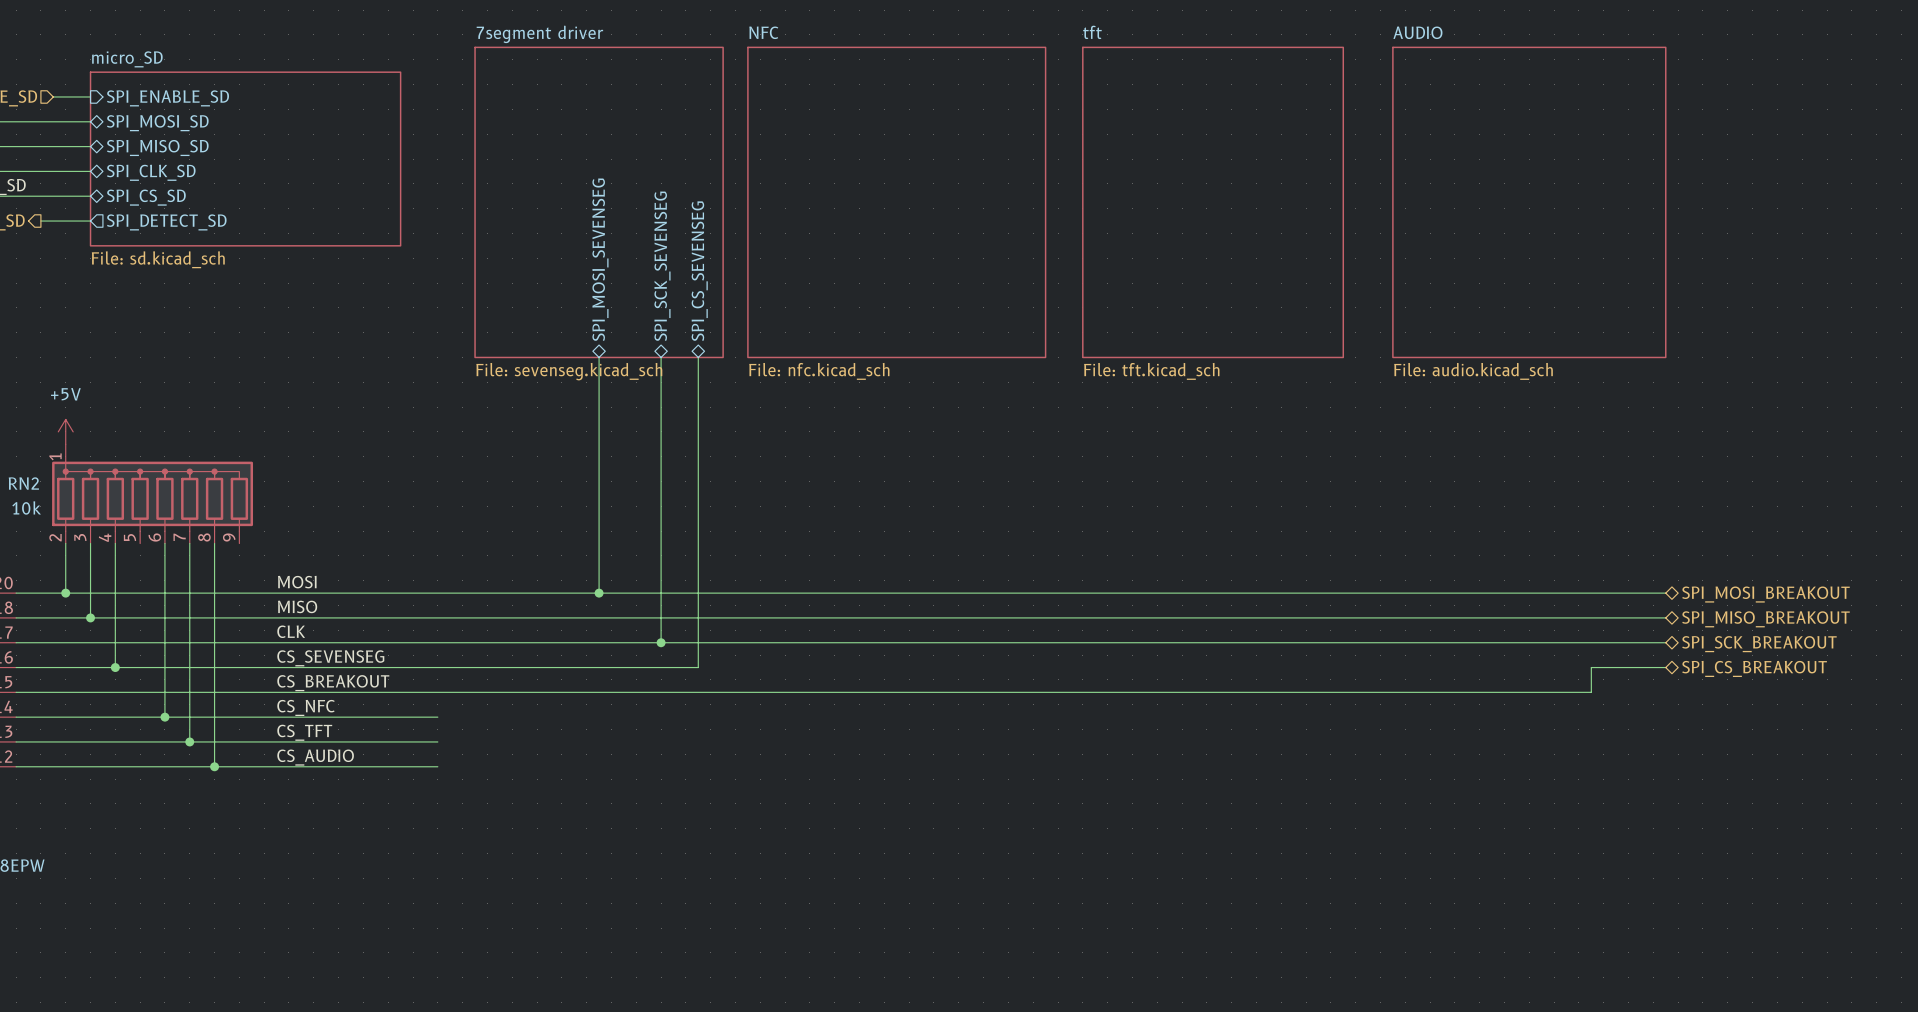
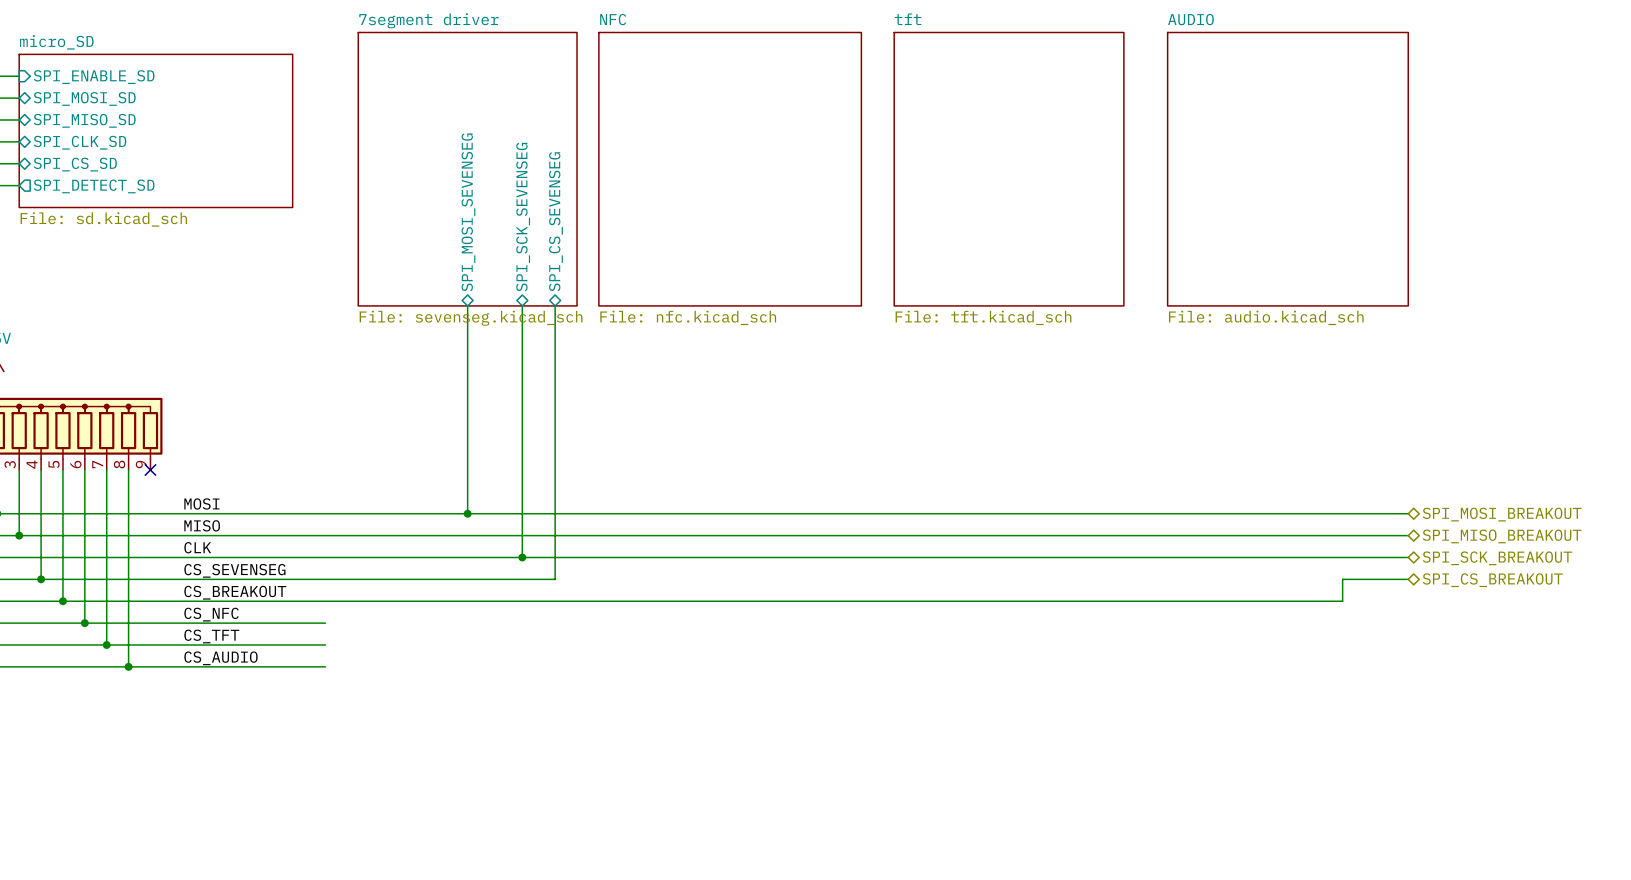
wire: none -> (62, 469) (62, 601)
no-connect mark: none -> (150, 469)
junction: none -> (62, 601)

